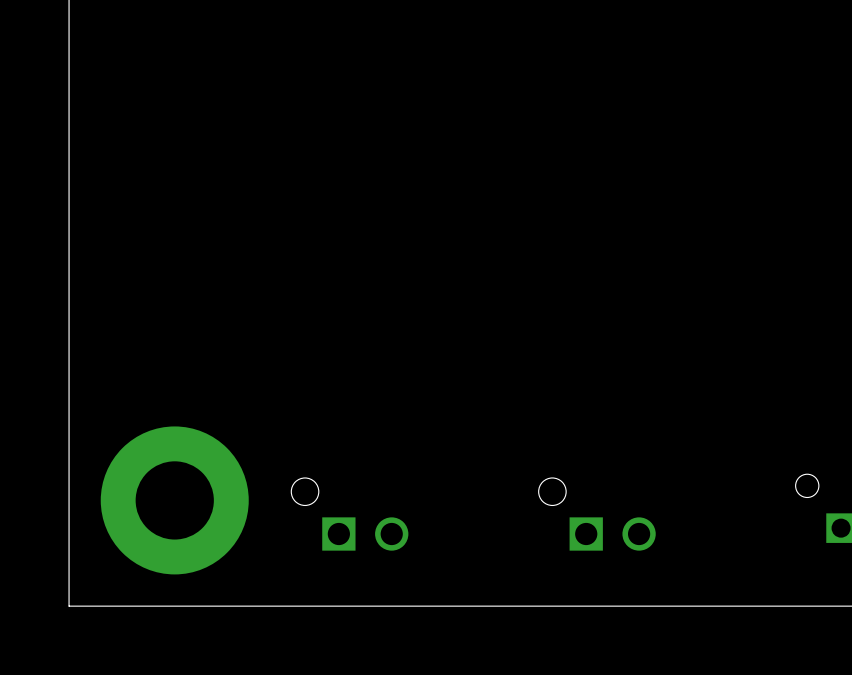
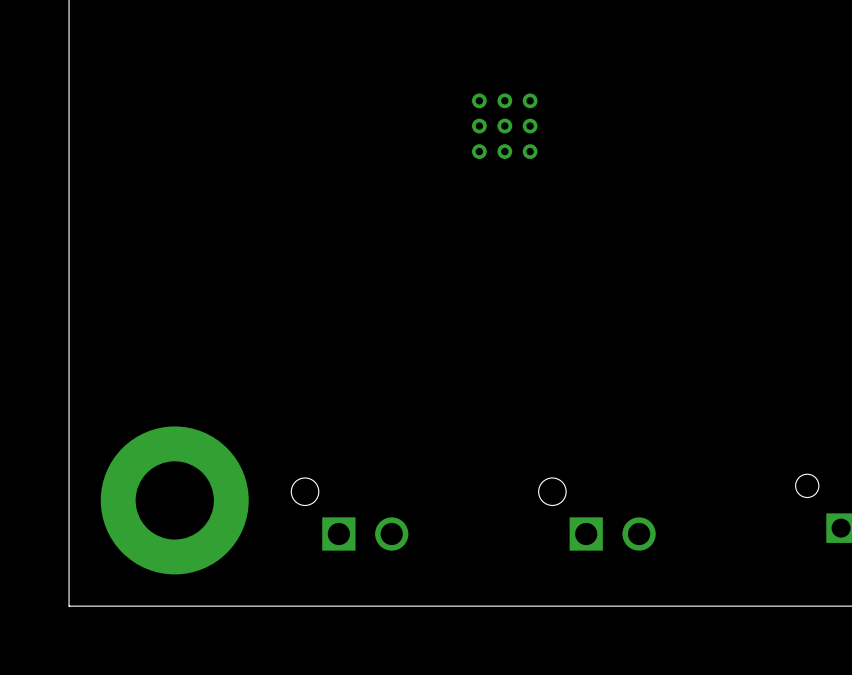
via: none -> (479, 100)
via: none -> (504, 100)
via: none -> (530, 100)
via: none -> (479, 126)
via: none -> (504, 126)
via: none -> (530, 126)
via: none -> (479, 151)
via: none -> (504, 151)
via: none -> (530, 151)

